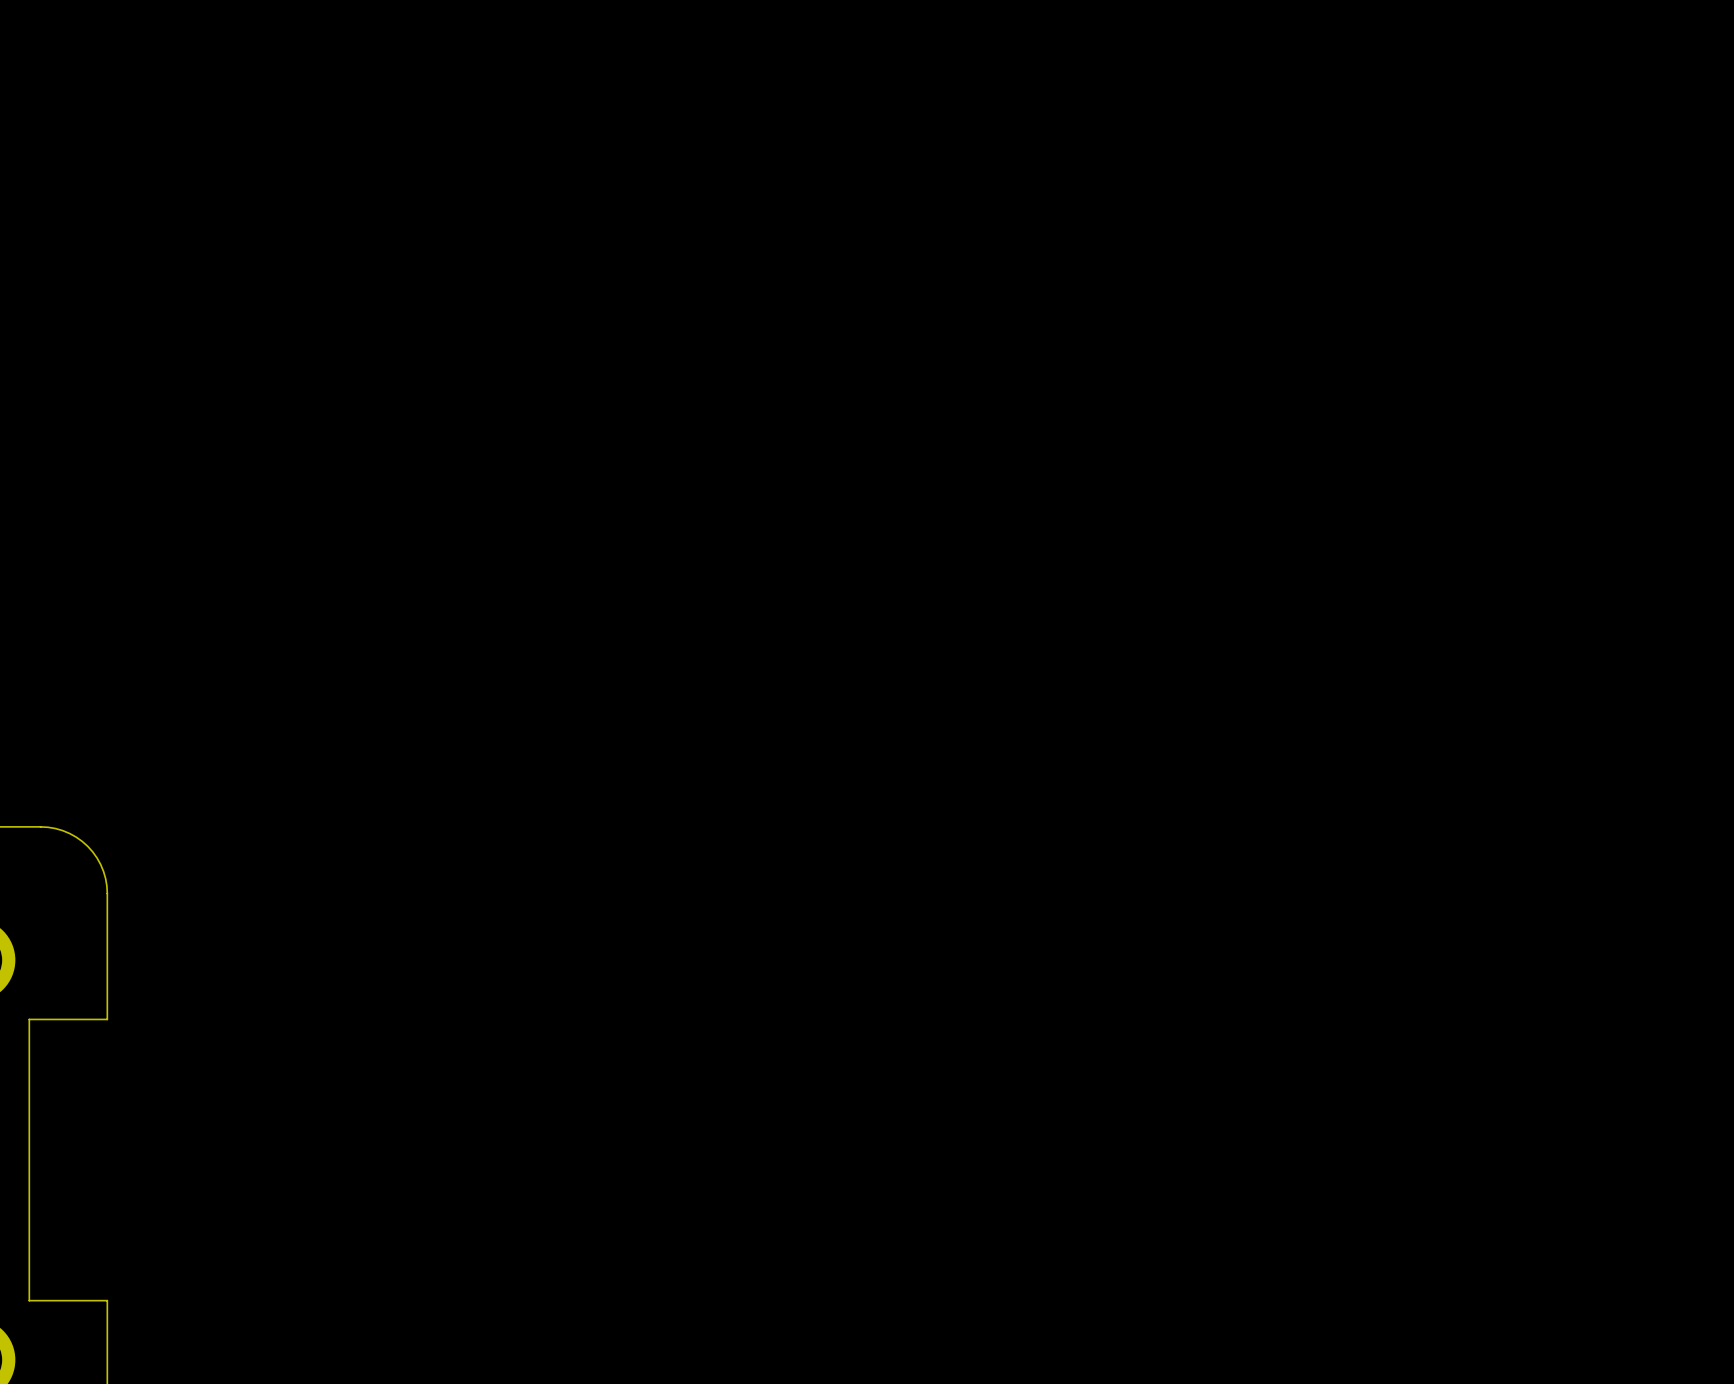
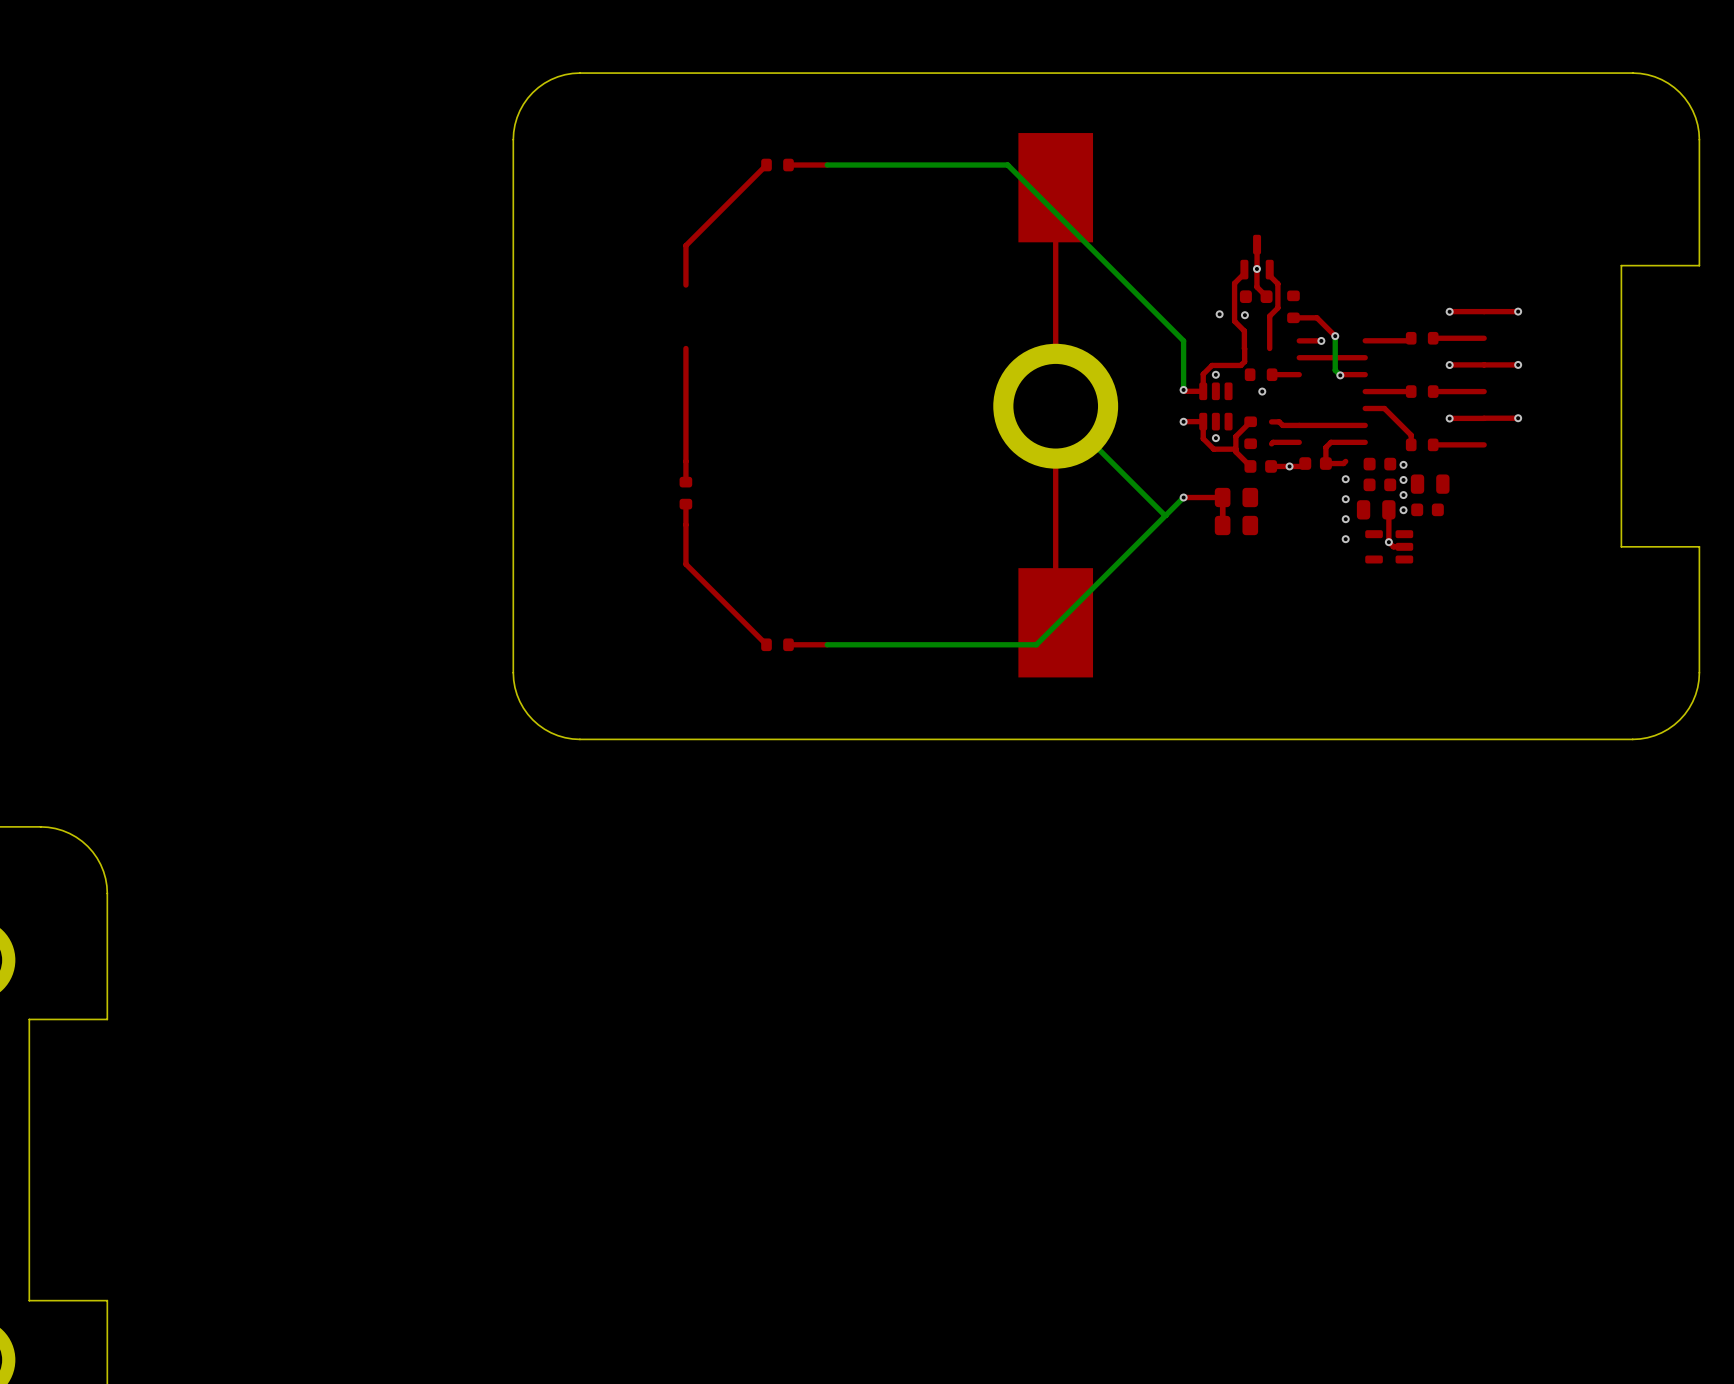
board edge: none -> (1632, 73) (579, 73) (557, 76) (544, 83) (532, 92) (523, 104) (517, 117) (513, 139) (513, 672) (517, 694) (523, 708) (532, 719) (551, 732) (565, 737) (579, 739) (1632, 739) (1647, 737) (1668, 729) (1679, 719) (1689, 708) (1697, 687) (1699, 546) (1621, 546) (1621, 265) (1699, 265) (1699, 139) (1697, 124) (1692, 110) (1679, 92) (1668, 83) (1654, 76) (1632, 73)
top track: none -> (766, 165) (685, 245) (685, 285)
part: none -> (777, 165)
top track: none -> (827, 165) (788, 165)
bottom track: none -> (827, 165) (1007, 165) (1183, 340) (1183, 389)
top track: none -> (1055, 187) (1055, 622)
part: none -> (1055, 187)
top track: none -> (1257, 244) (1257, 268)
part: none -> (1257, 257)
top track: none -> (1256, 268) (1256, 287) (1266, 296)
via: none -> (1256, 268)
top track: none -> (1244, 269) (1244, 273) (1234, 283) (1234, 321) (1244, 331) (1244, 361) (1240, 365) (1212, 365) (1203, 374) (1203, 391) (1183, 389)
top track: none -> (1269, 269) (1269, 275) (1277, 283) (1277, 307) (1269, 316) (1269, 348)
part: none -> (1256, 296)
part: none -> (1293, 306)
via: none -> (1449, 311)
top track: none -> (1518, 311) (1449, 311)
via: none -> (1518, 311)
via: none -> (1219, 314)
via: none -> (1244, 315)
top track: none -> (1293, 317) (1316, 317) (1335, 336)
bottom track: none -> (1335, 336) (1335, 370) (1340, 375)
via: none -> (1335, 336)
top track: none -> (1411, 338) (1408, 340) (1365, 340)
part: none -> (1422, 338)
top track: none -> (1484, 338) (1433, 338)
top track: none -> (1321, 340) (1299, 340)
via: none -> (1321, 340)
top track: none -> (685, 348) (685, 482)
top track: none -> (1365, 357) (1299, 357)
top track: none -> (1484, 364) (1449, 364)
top track: none -> (1518, 364) (1484, 364)
via: none -> (1518, 364)
via: none -> (1449, 365)
via: none -> (1215, 374)
part: none -> (1261, 374)
top track: none -> (1299, 374) (1272, 374)
top track: none -> (1365, 374) (1340, 375)
via: none -> (1340, 375)
via: none -> (1183, 389)
via: none -> (1262, 391)
top track: none -> (1411, 391) (1365, 391)
part: none -> (1422, 391)
top track: none -> (1484, 391) (1433, 391)
bottom track: none -> (1055, 406) (1165, 515)
part: none -> (1055, 406)
part: none -> (1215, 406)
top track: none -> (1365, 408) (1384, 408) (1411, 435) (1411, 444)
via: none -> (1449, 418)
top track: none -> (1484, 418) (1449, 418)
top track: none -> (1518, 418) (1484, 418)
via: none -> (1518, 418)
top track: none -> (1183, 421) (1203, 421) (1203, 438) (1213, 449) (1235, 449)
via: none -> (1183, 421)
top track: none -> (1250, 421) (1235, 436) (1235, 451) (1250, 466)
top track: none -> (1271, 421) (1279, 421) (1282, 425) (1365, 425)
part: none -> (1250, 432)
via: none -> (1215, 438)
top track: none -> (1299, 442) (1271, 443)
top track: none -> (1365, 442) (1330, 442) (1325, 447) (1325, 463) (1343, 463) (1345, 461)
part: none -> (1422, 444)
top track: none -> (1484, 444) (1433, 444)
top track: none -> (1305, 463) (1302, 466) (1271, 466)
part: none -> (1315, 463)
part: none -> (1379, 464)
via: none -> (1403, 464)
part: none -> (1260, 466)
via: none -> (1289, 466)
via: none -> (1345, 479)
via: none -> (1403, 479)
part: none -> (1379, 484)
part: none -> (1430, 484)
part: none -> (685, 493)
via: none -> (1403, 495)
top track: none -> (1183, 497) (1222, 497) (1222, 525)
bottom track: none -> (1183, 497) (1036, 644) (827, 644)
via: none -> (1183, 497)
part: none -> (1236, 497)
via: none -> (1345, 499)
top track: none -> (685, 504) (685, 564) (766, 644)
part: none -> (1376, 509)
top track: none -> (1388, 509) (1388, 542) (1393, 546) (1404, 546)
part: none -> (1427, 509)
via: none -> (1403, 510)
via: none -> (1345, 519)
part: none -> (1236, 525)
via: none -> (1345, 539)
via: none -> (1388, 542)
part: none -> (1389, 546)
part: none -> (1055, 622)
part: none -> (777, 644)
top track: none -> (827, 644) (788, 644)

